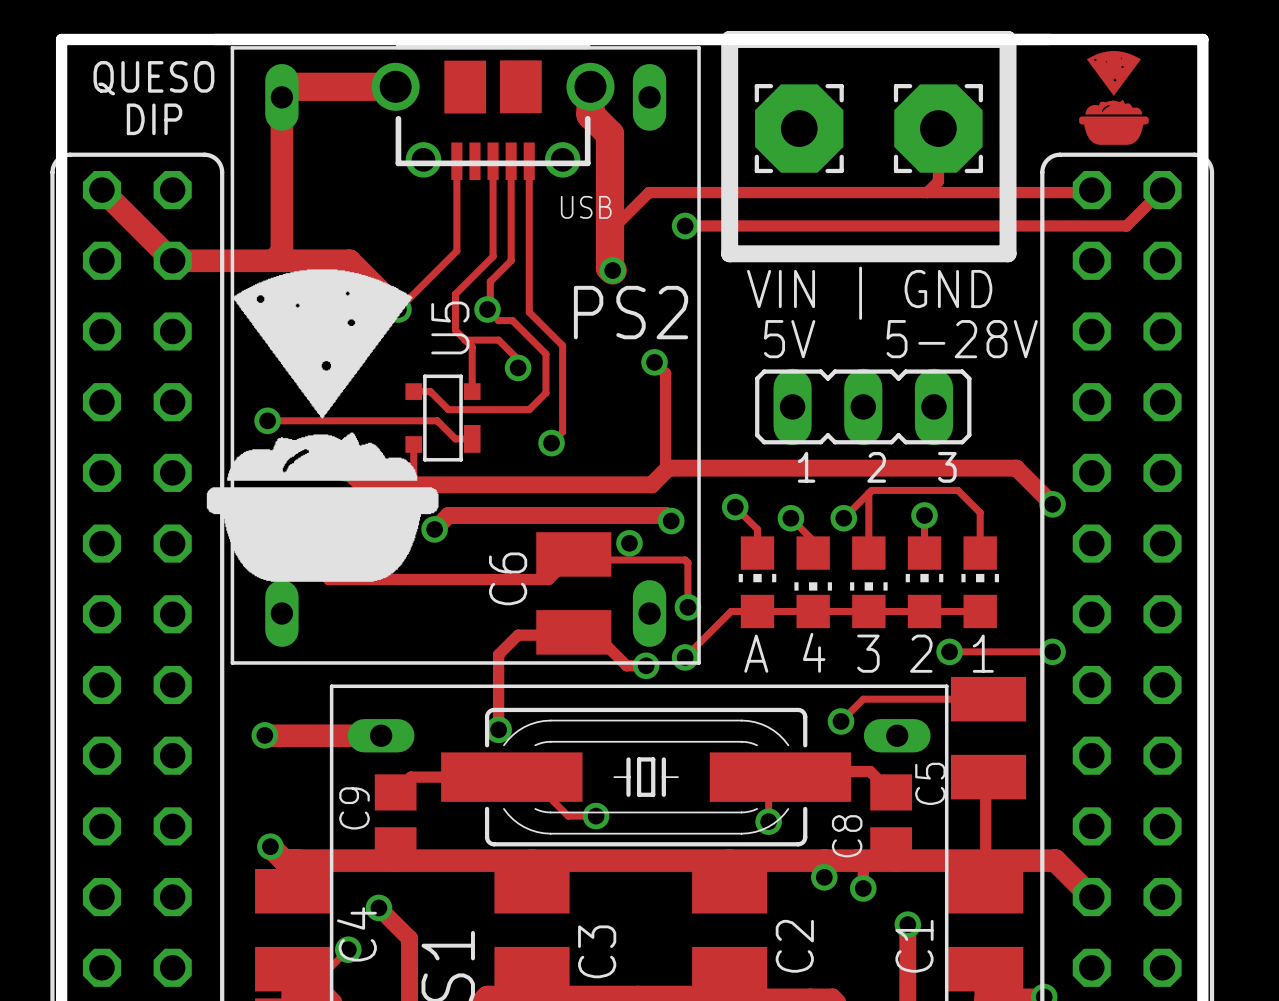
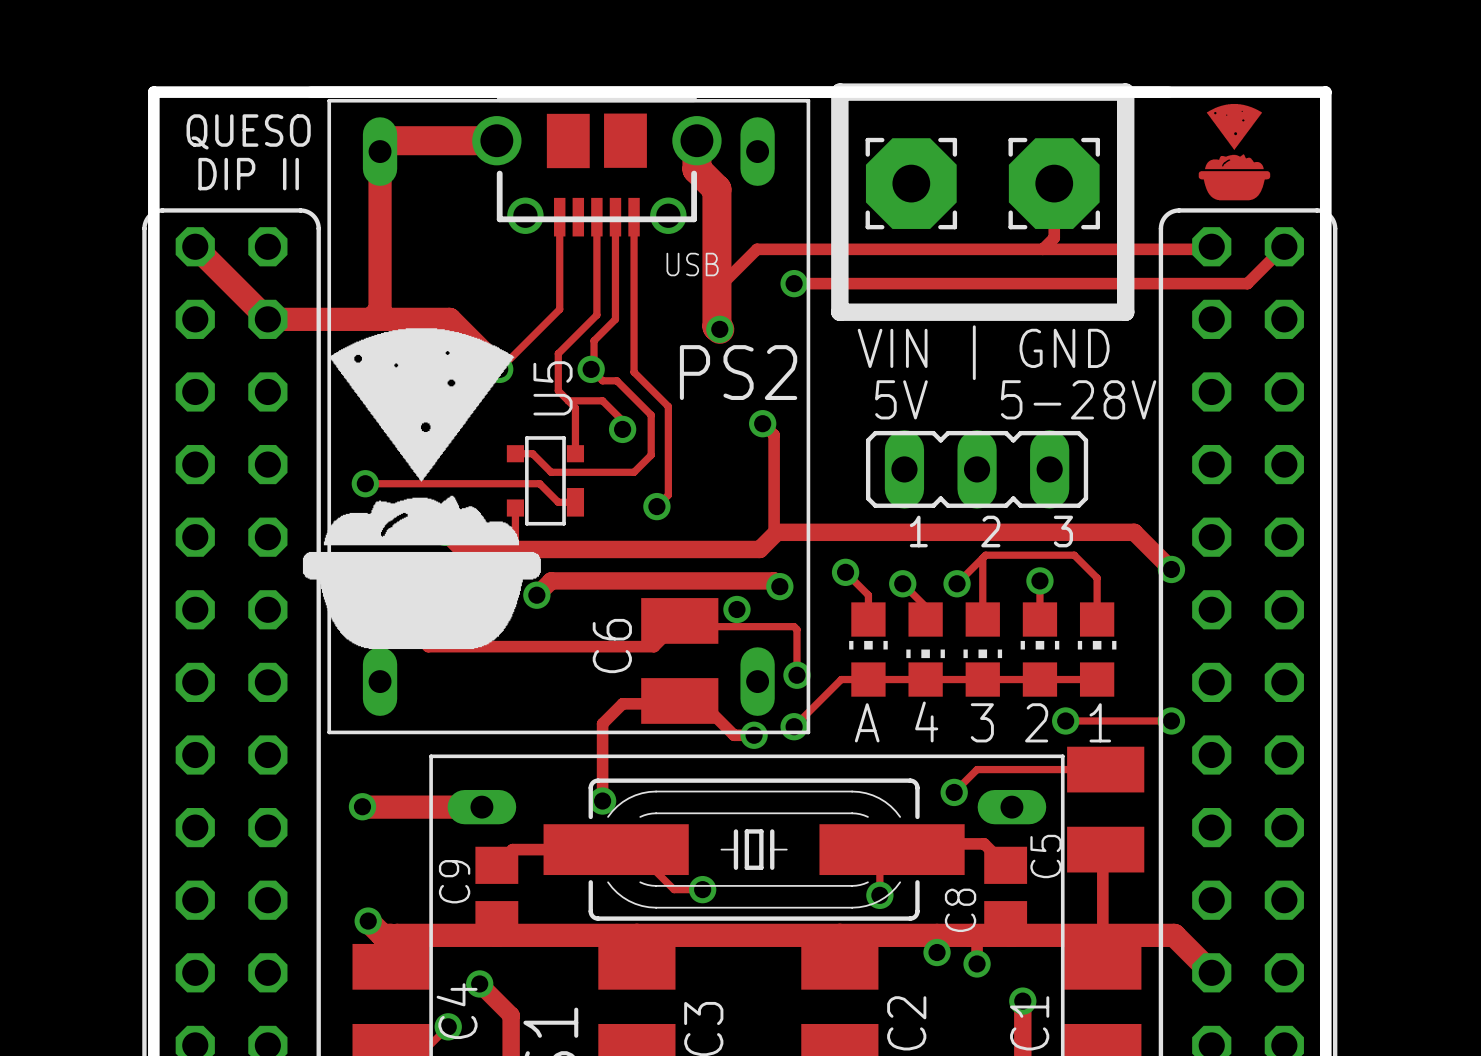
text: DIP (154, 119) -> DIP II (248, 174)

